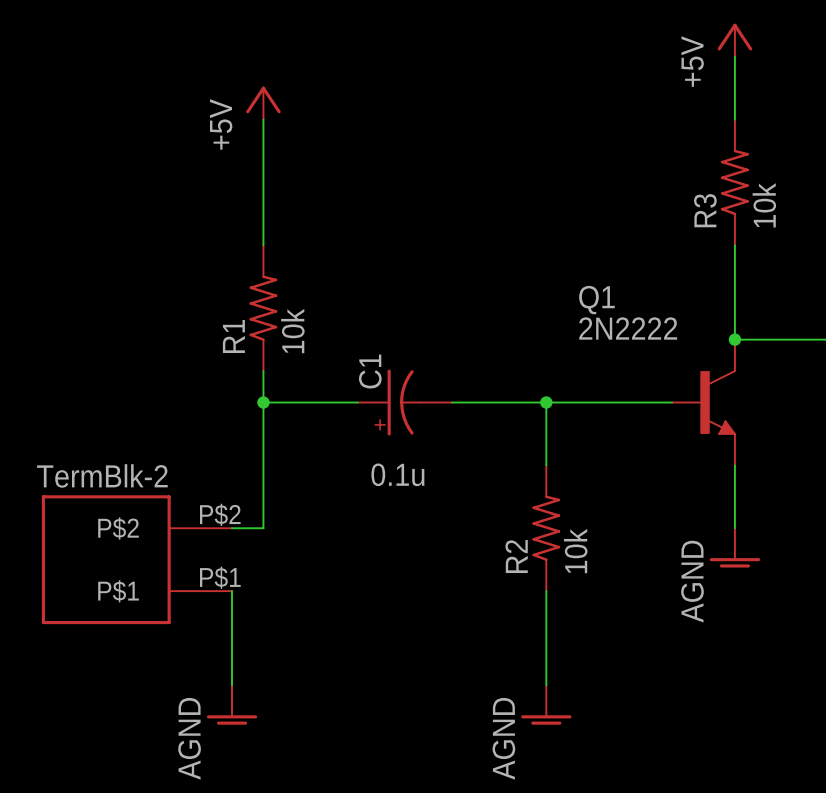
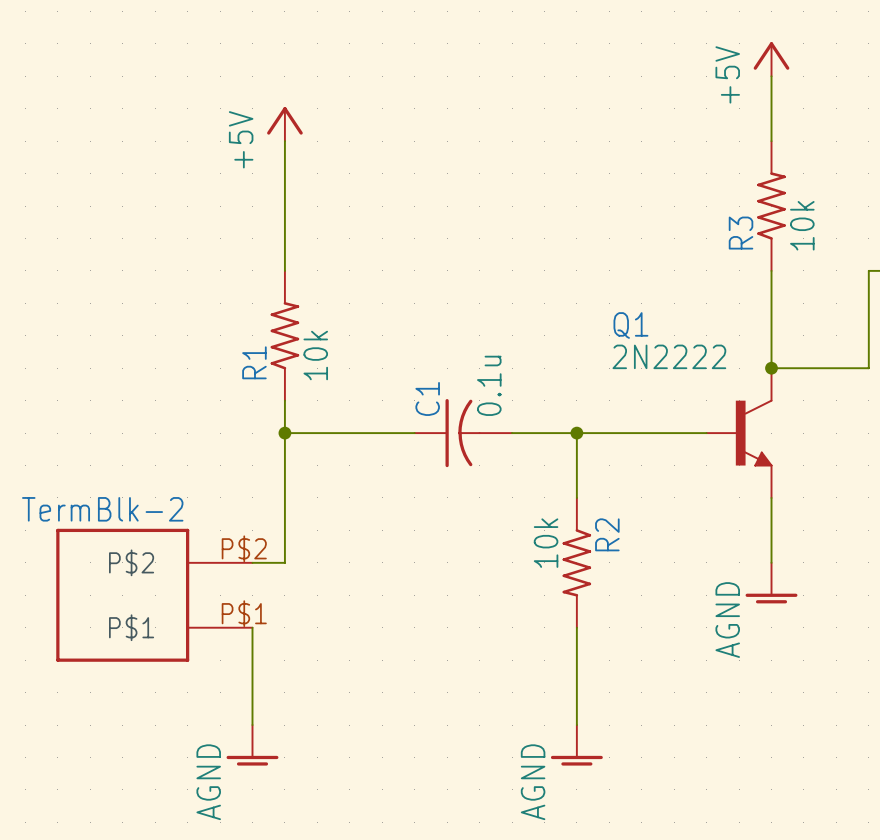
C1 symbol: [357, 369, 453, 436] -> [414, 399, 513, 468]
C1 value position: 0.1u (397, 474) -> 0.1u (489, 385)
R2 rotation: 0° (546, 528) -> 180° (576, 562)

